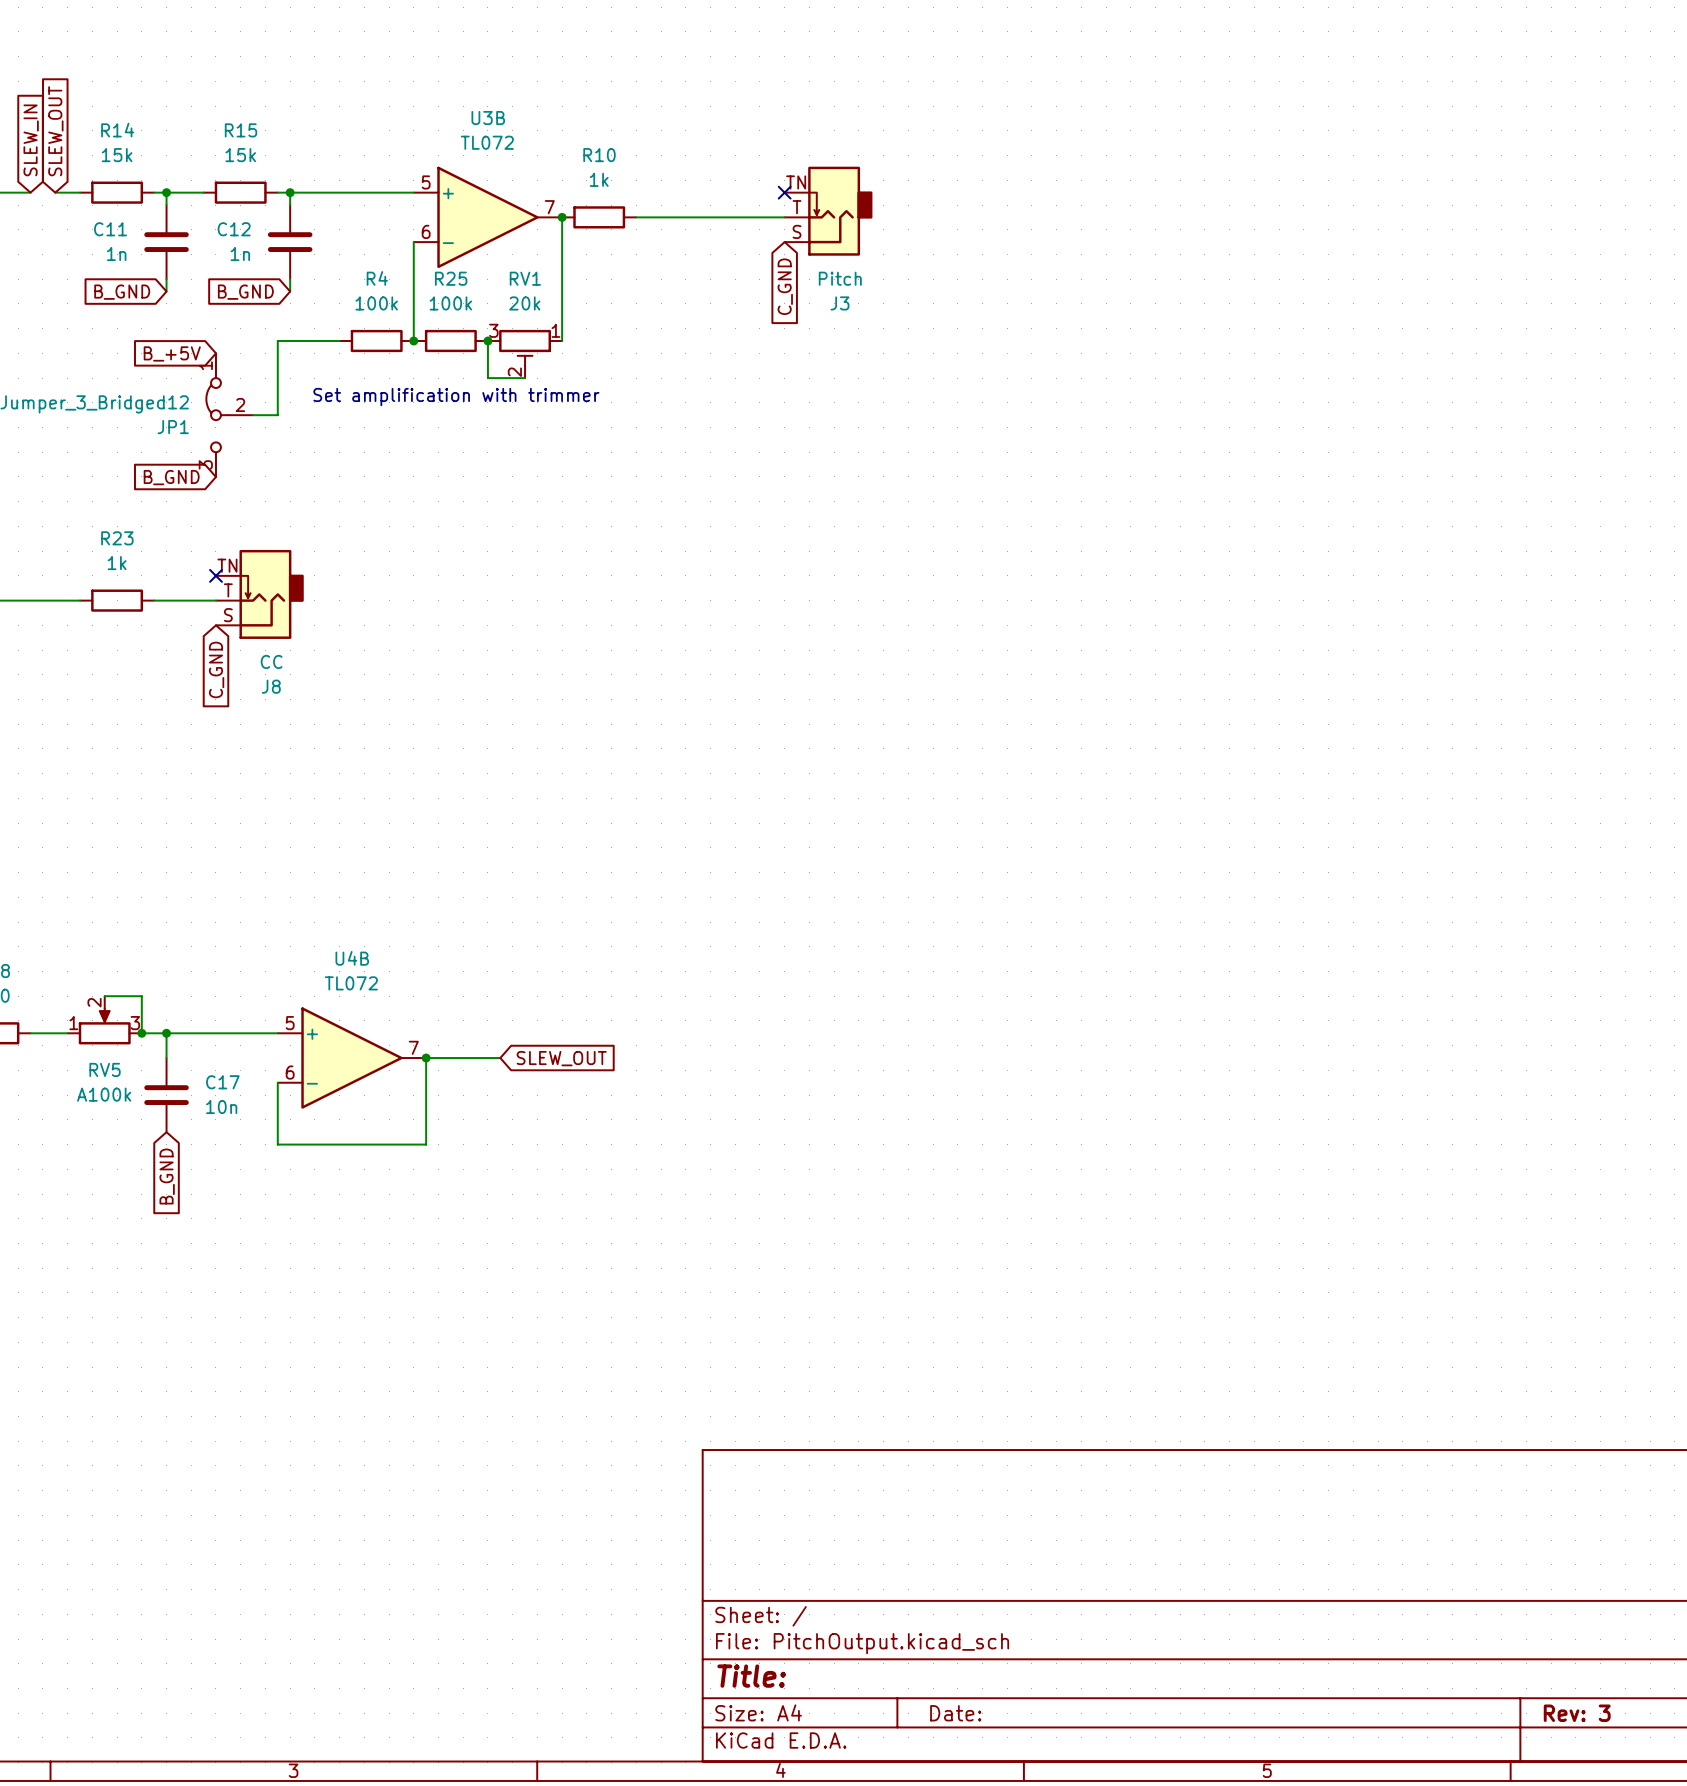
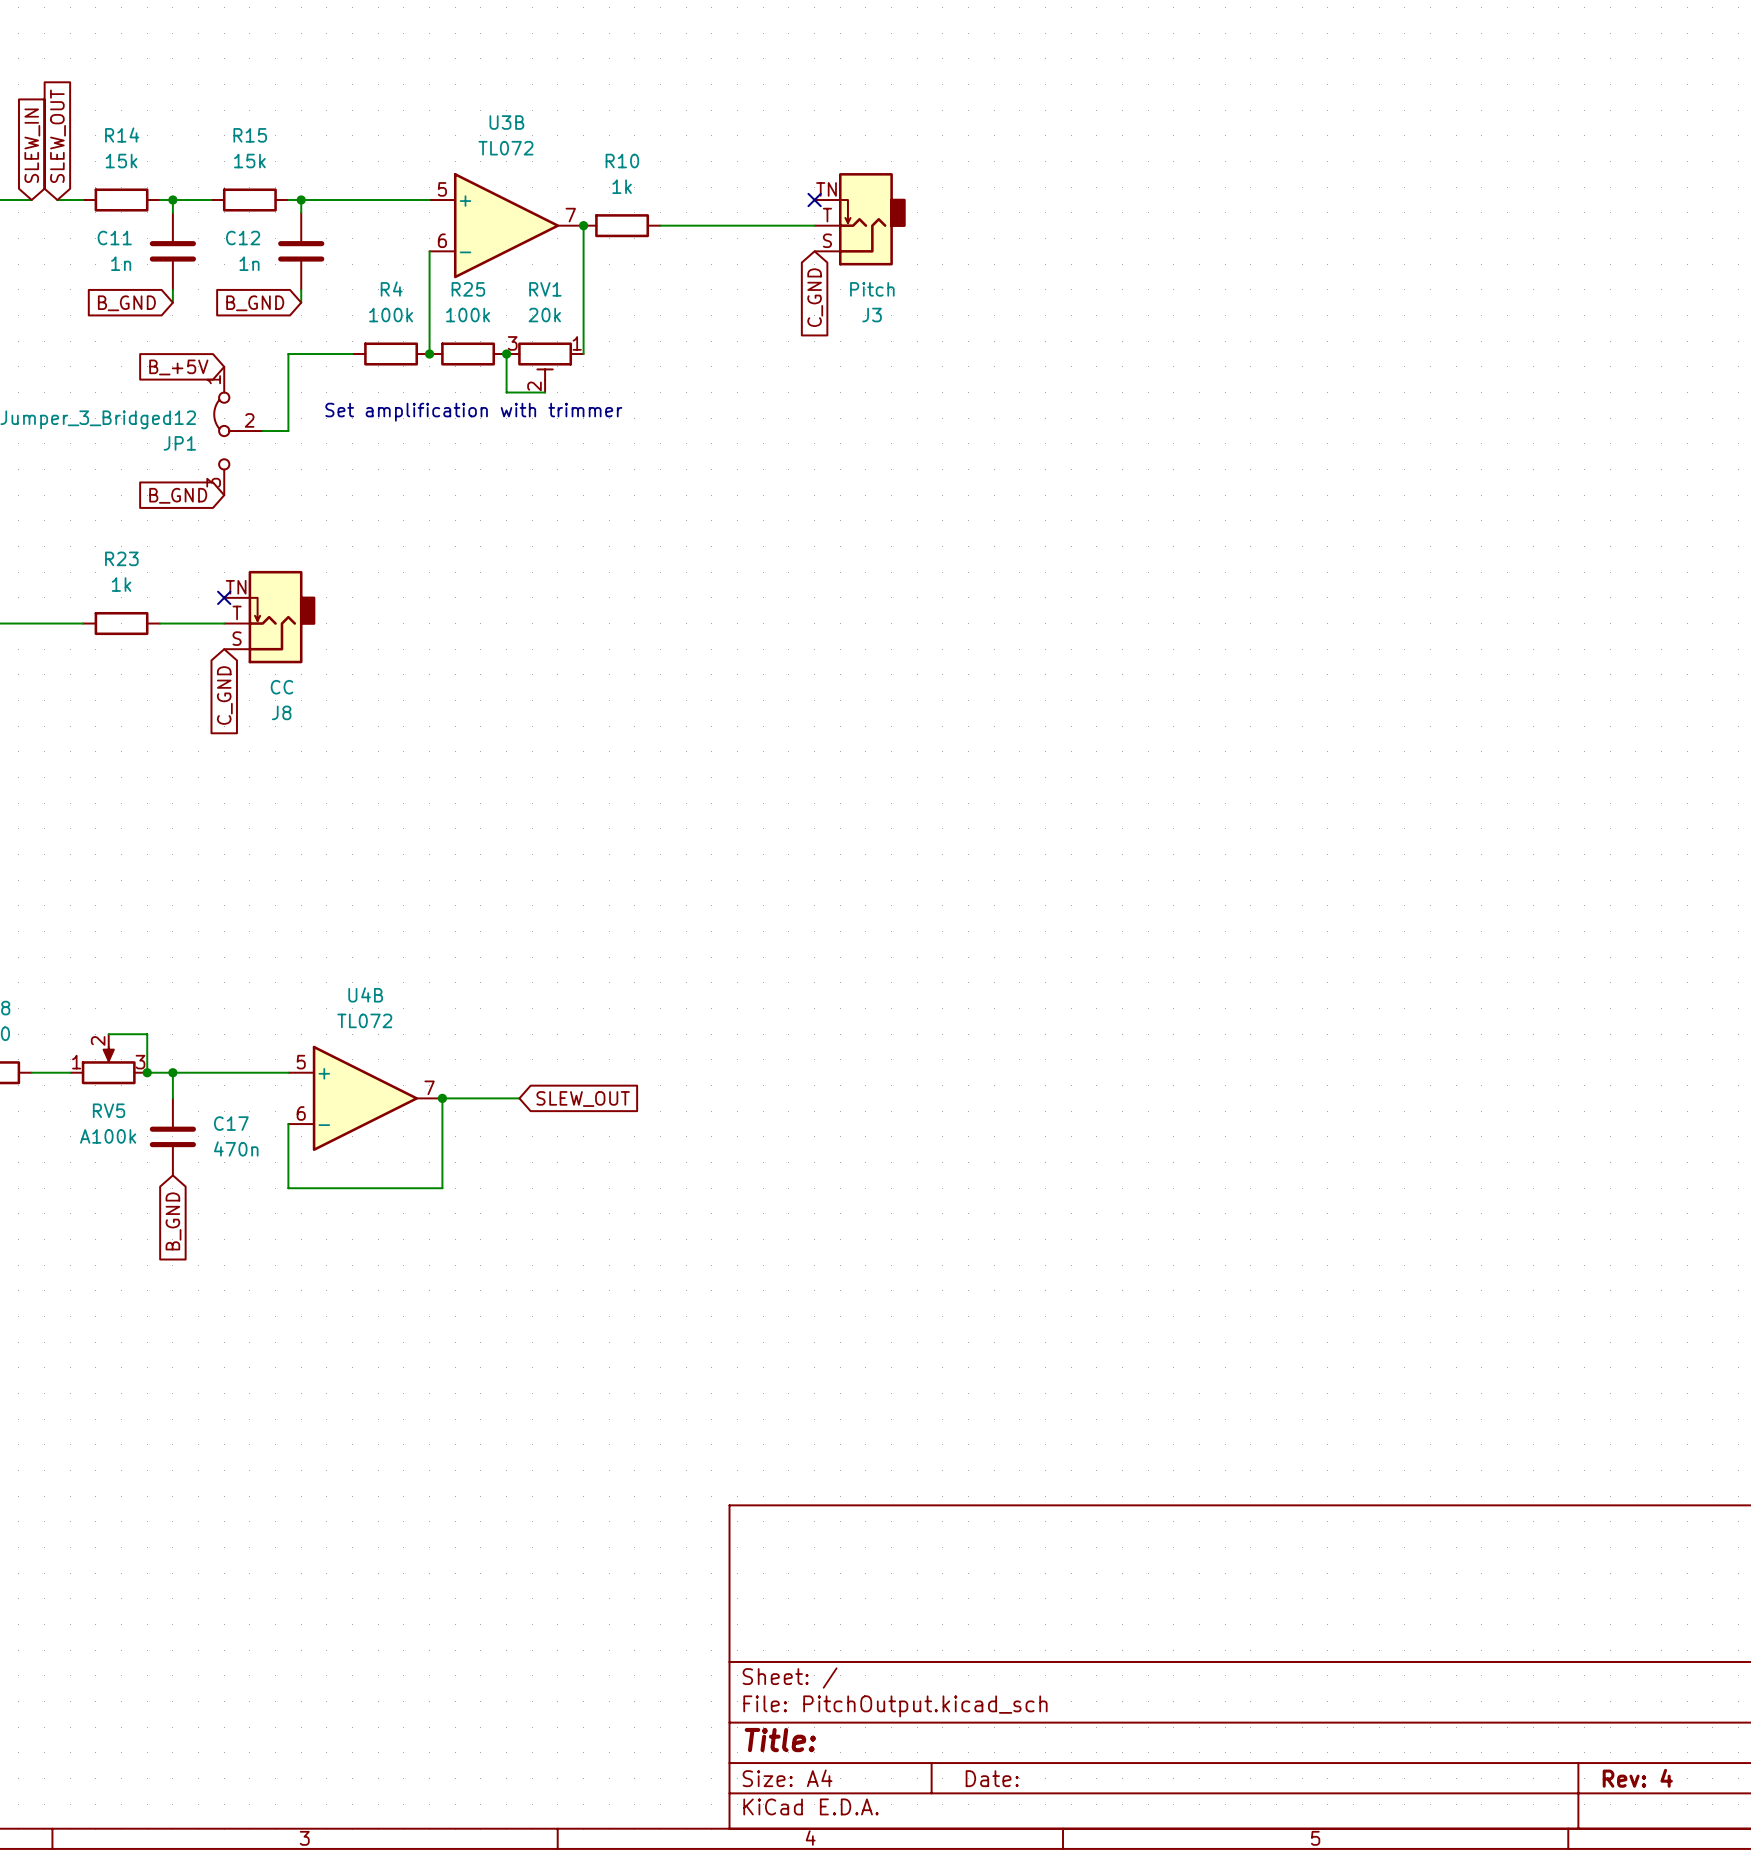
C17 value: 10n (221, 1107) -> 470n (236, 1148)
title block: Rev: 3 (1577, 1713) -> Rev: 4 (1637, 1778)

